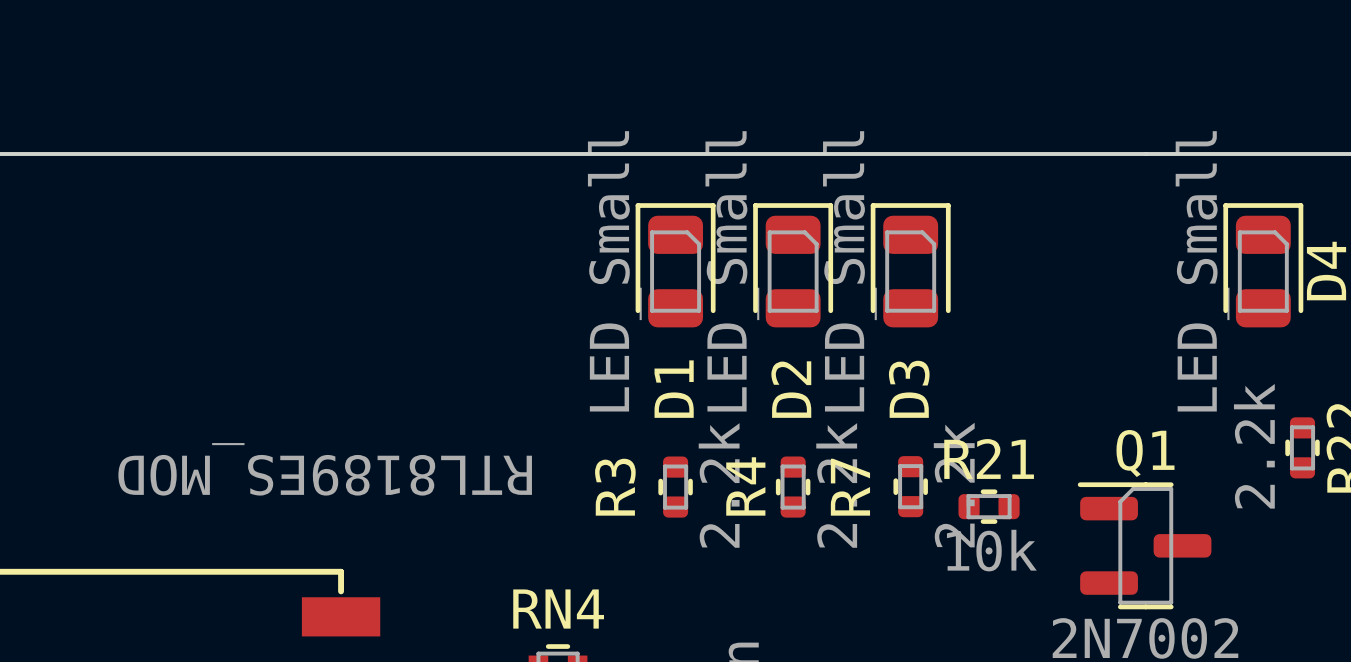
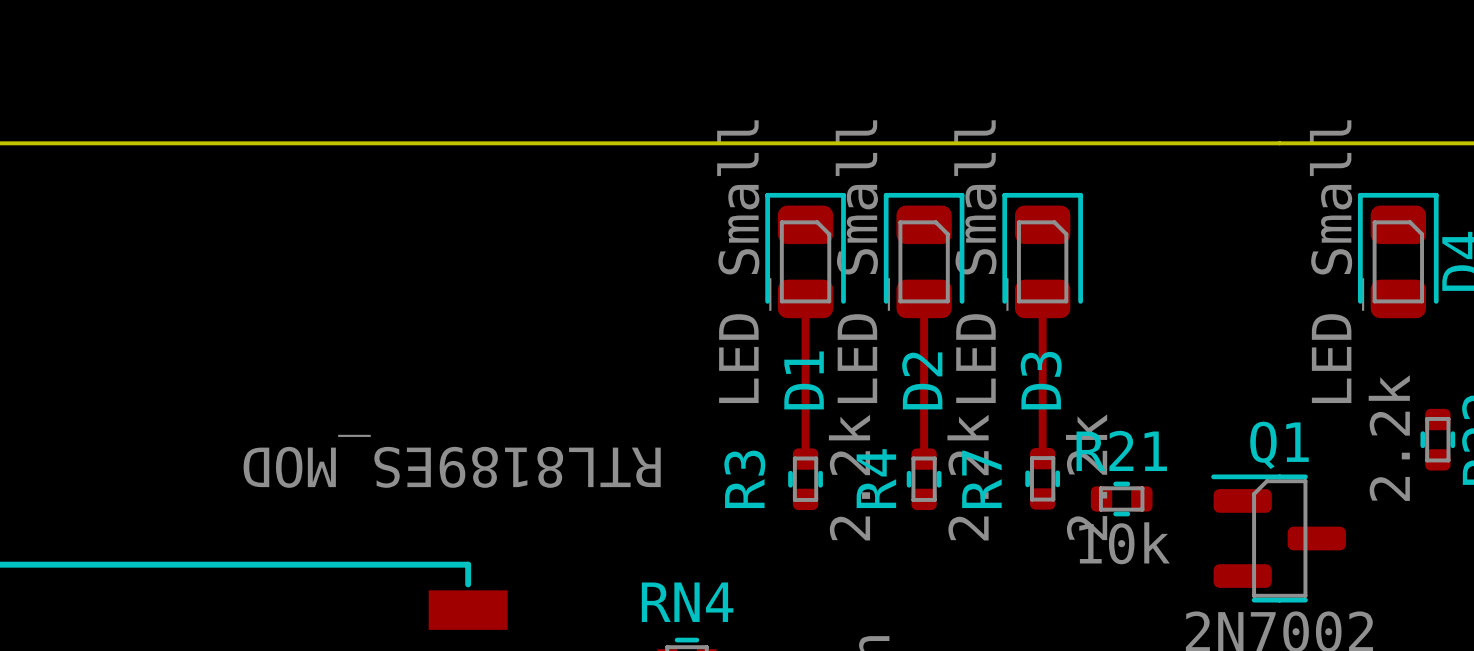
top track: none -> (805, 298) (805, 459)
top track: none -> (924, 298) (924, 459)
top track: none -> (1042, 298) (1042, 458)

